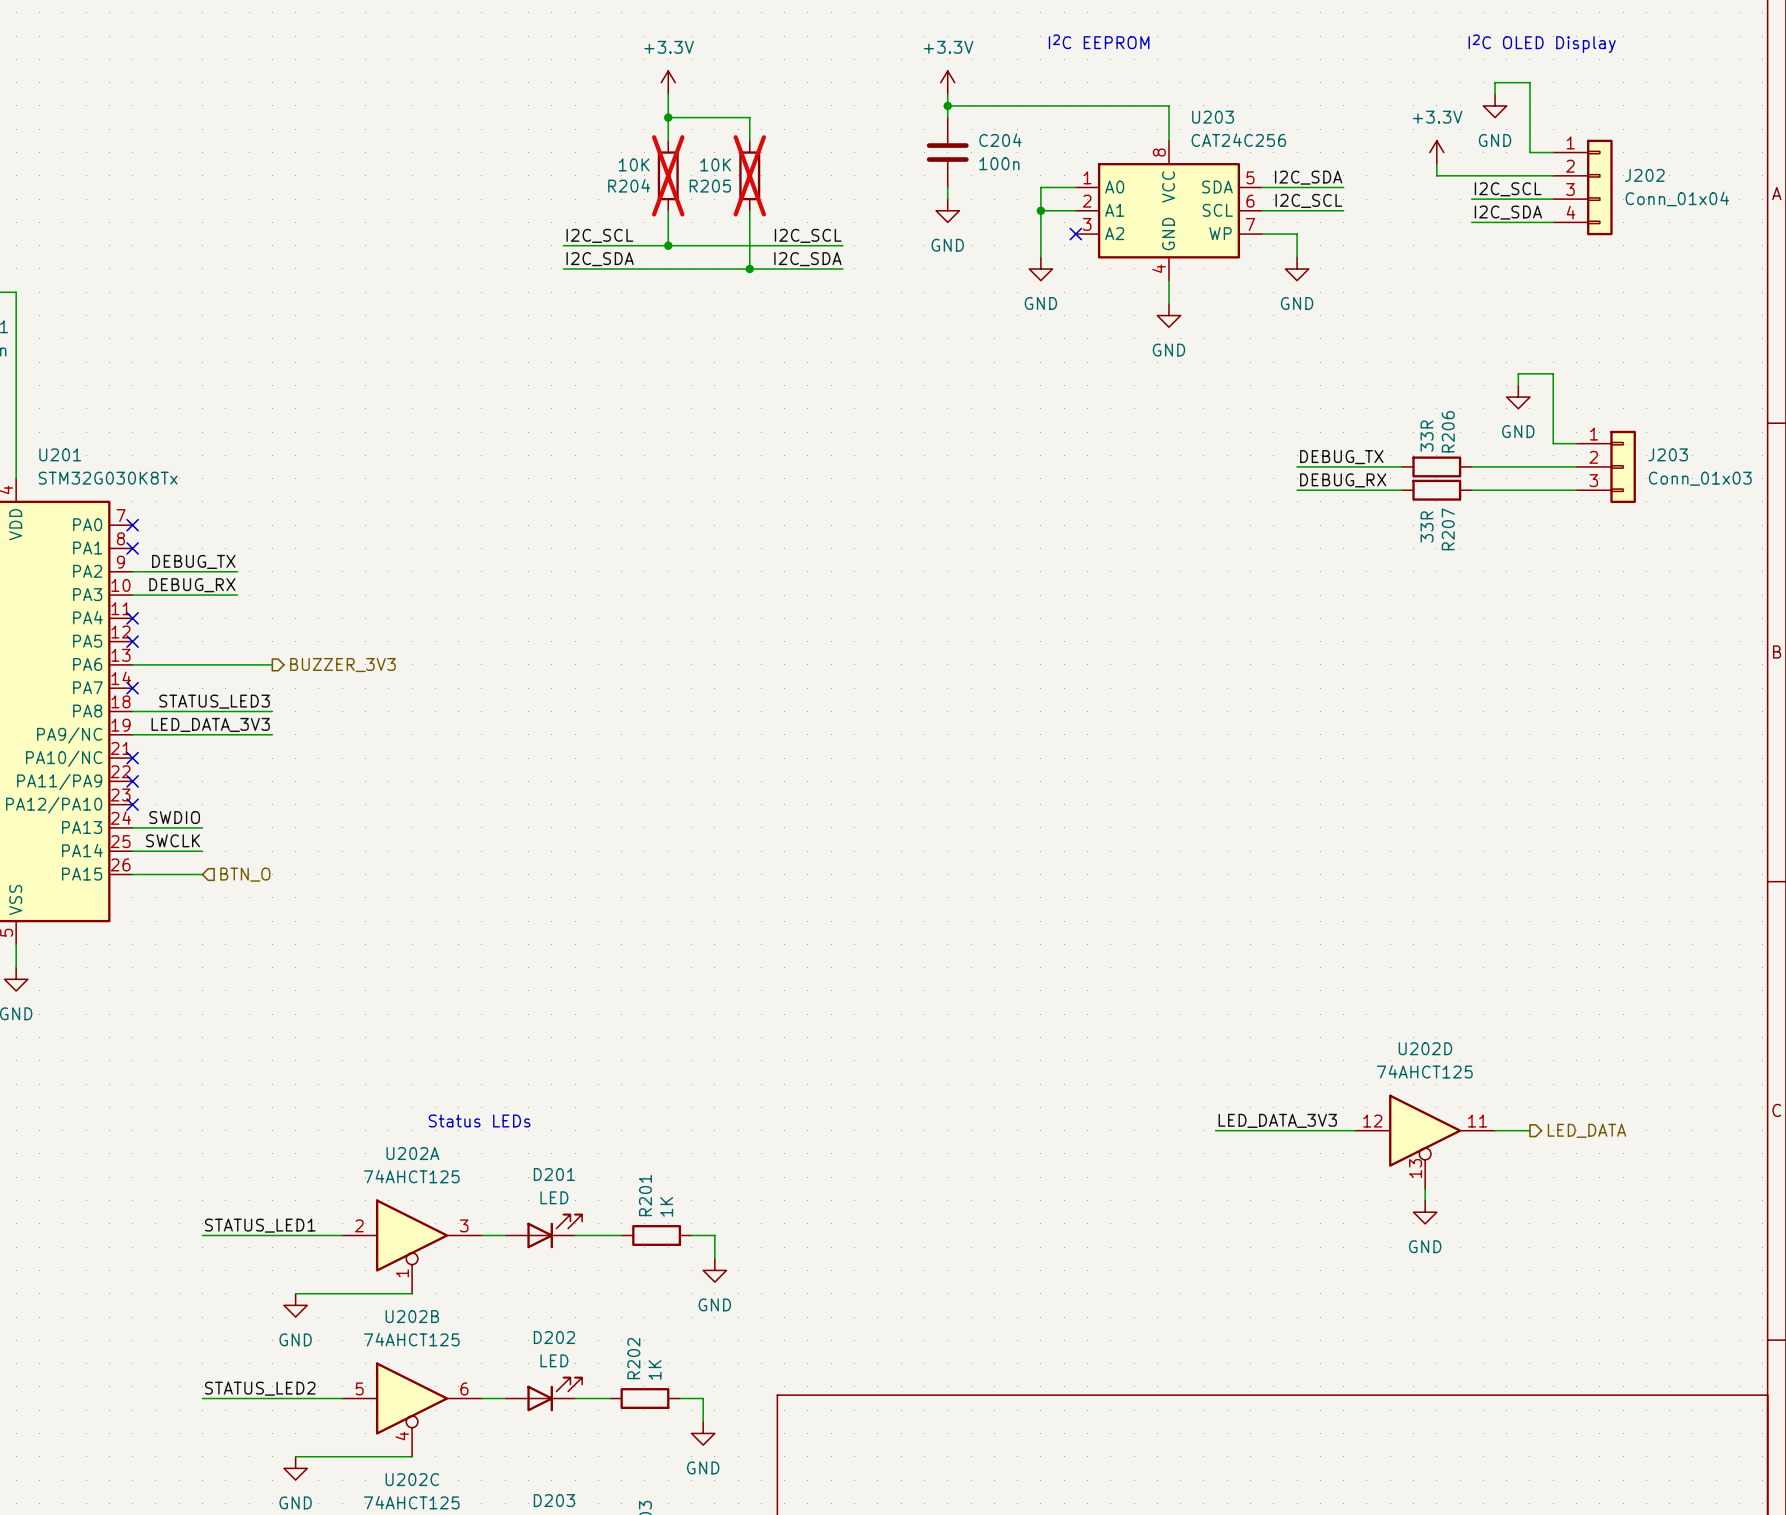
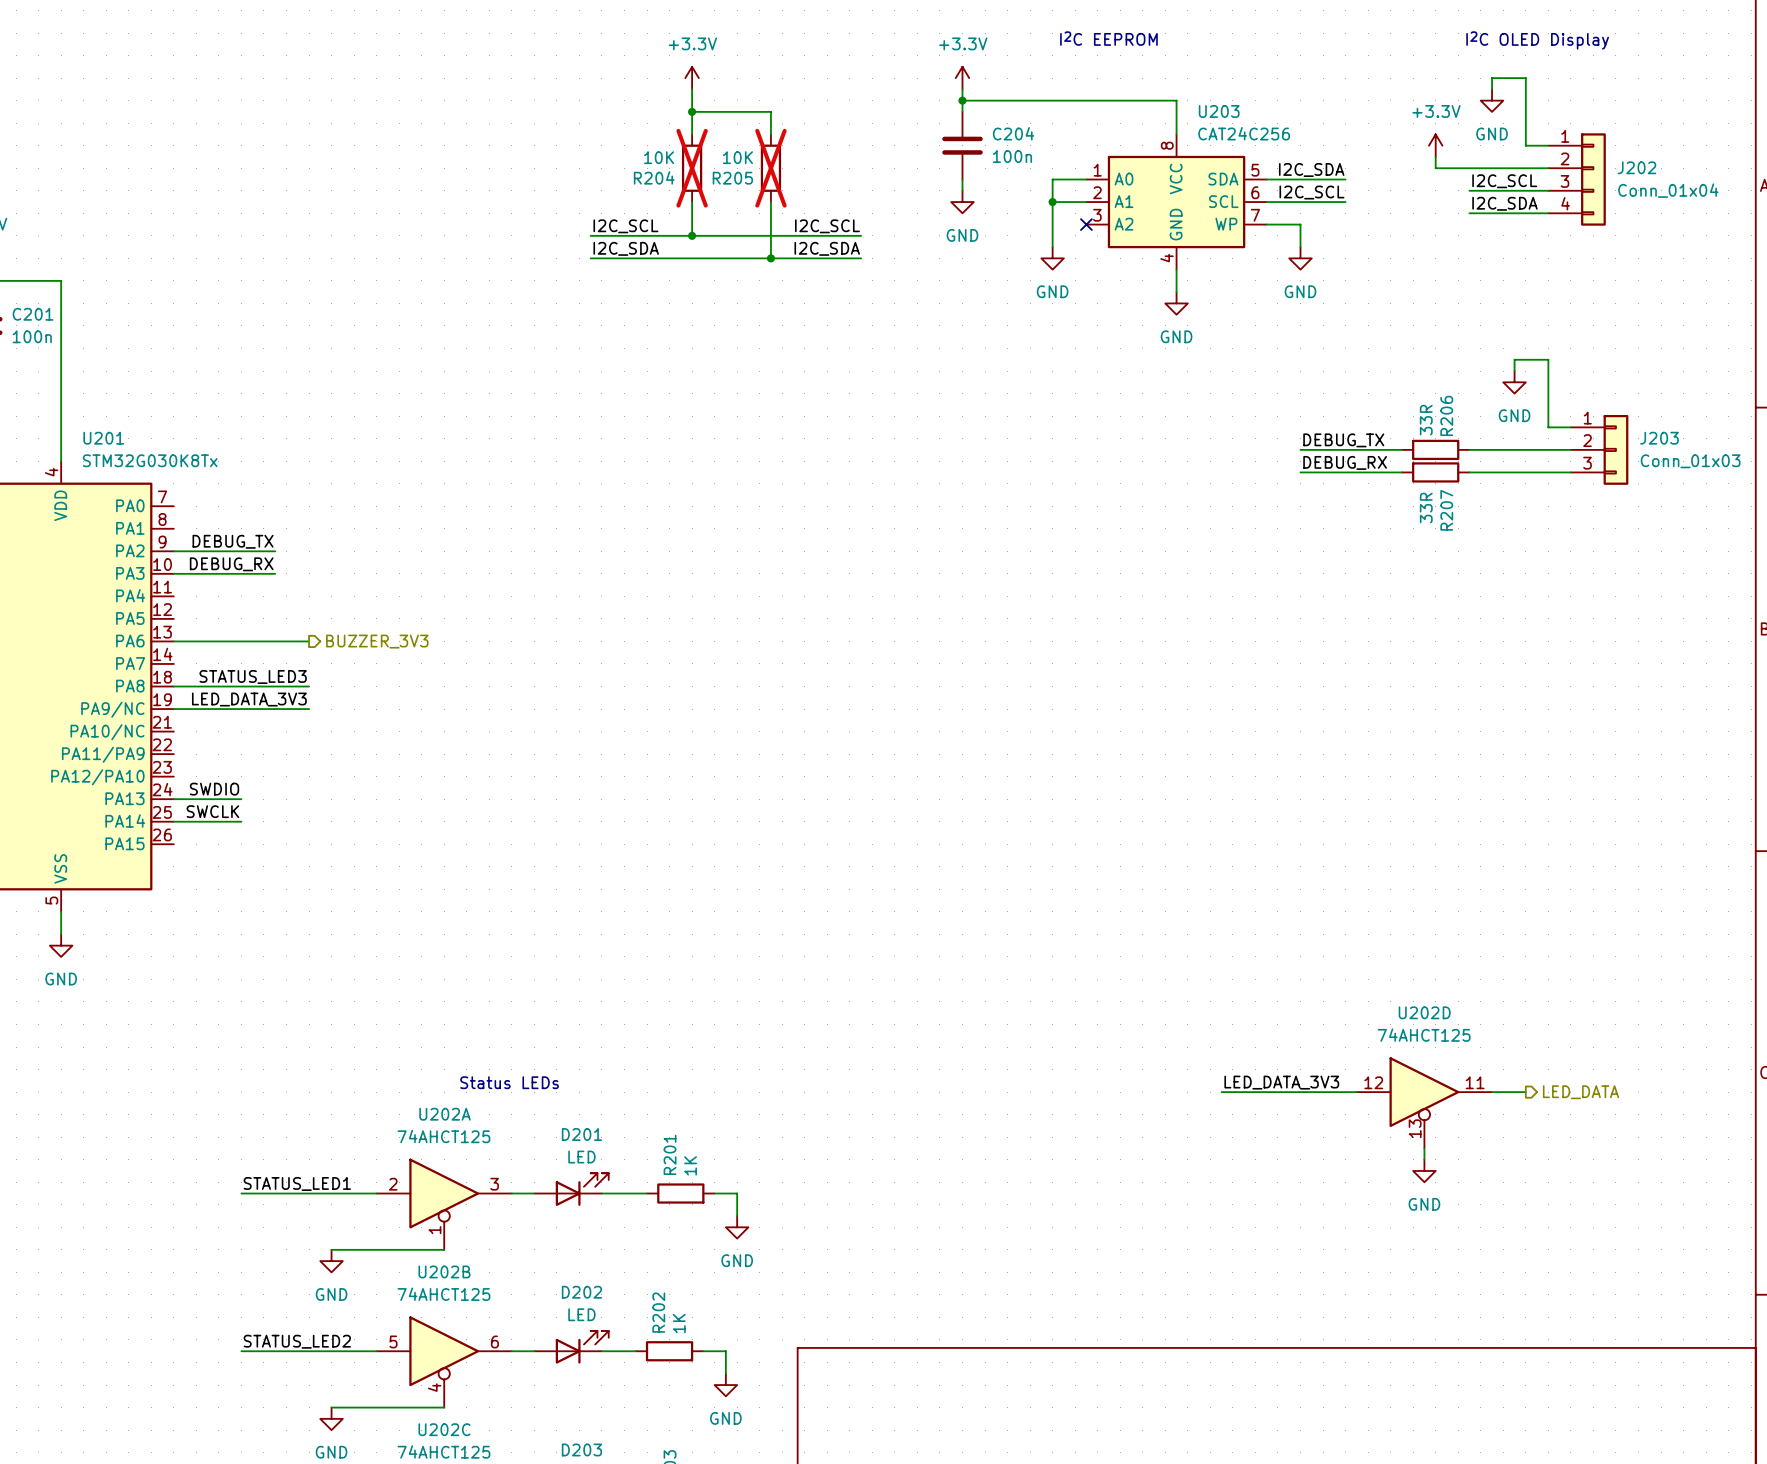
no-connect mark: (132, 525) -> none
no-connect mark: (132, 548) -> none
no-connect mark: (132, 618) -> none
no-connect mark: (132, 641) -> none
no-connect mark: (132, 688) -> none
no-connect mark: (132, 758) -> none
no-connect mark: (132, 781) -> none
no-connect mark: (132, 804) -> none
wire: (132, 874) (202, 874) -> none
hierarchical label: BTN_O (245, 874) -> none

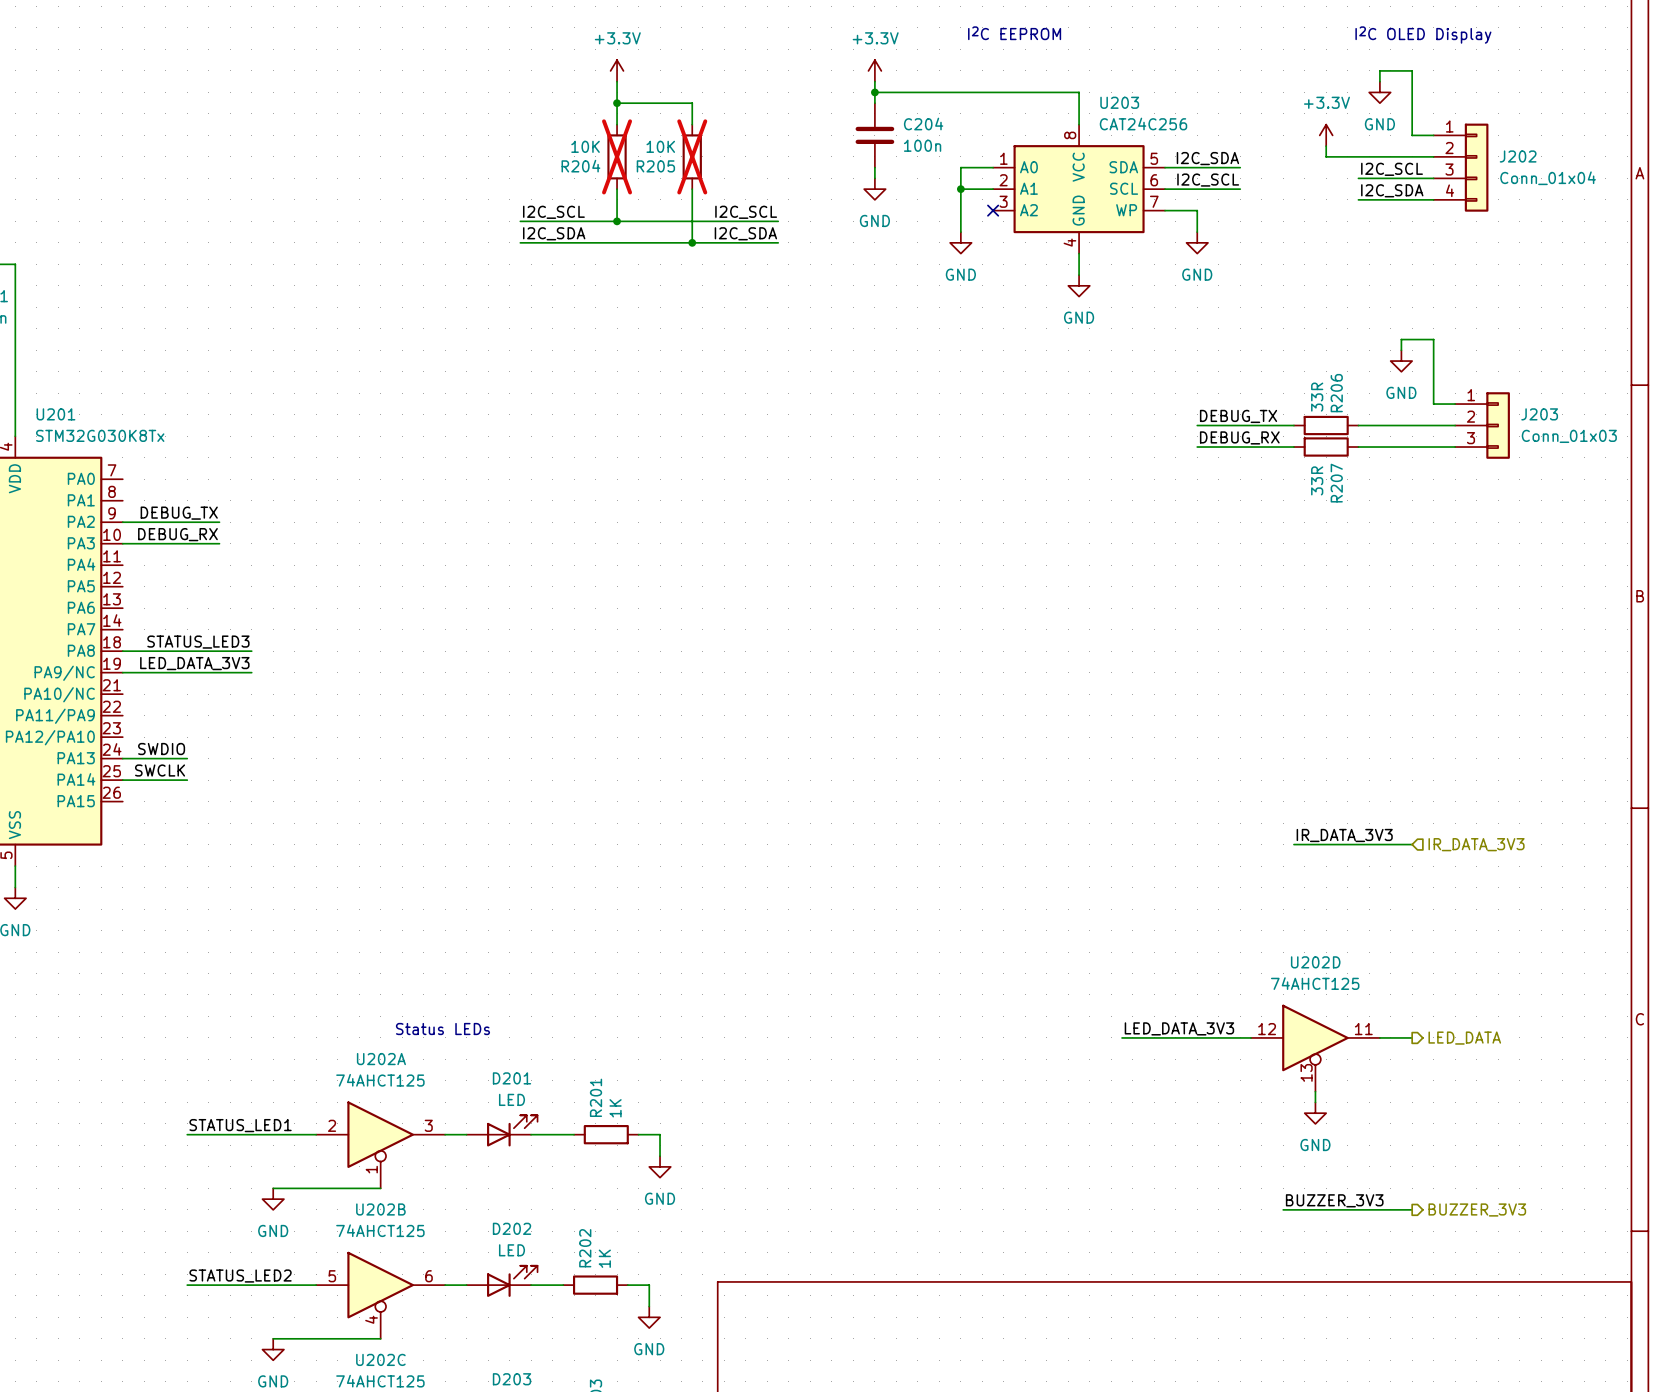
wire: (173, 641) (309, 641) -> none
hierarchical label: BUZZER_3V3 (377, 641) -> none
label: none -> IR_DATA_3V3 (1344, 835)
wire: none -> (1293, 844) (1412, 844)
hierarchical label: none -> IR_DATA_3V3 (1476, 844)
label: none -> BUZZER_3V3 (1334, 1200)
wire: none -> (1283, 1209) (1412, 1209)
hierarchical label: none -> BUZZER_3V3 (1477, 1209)

